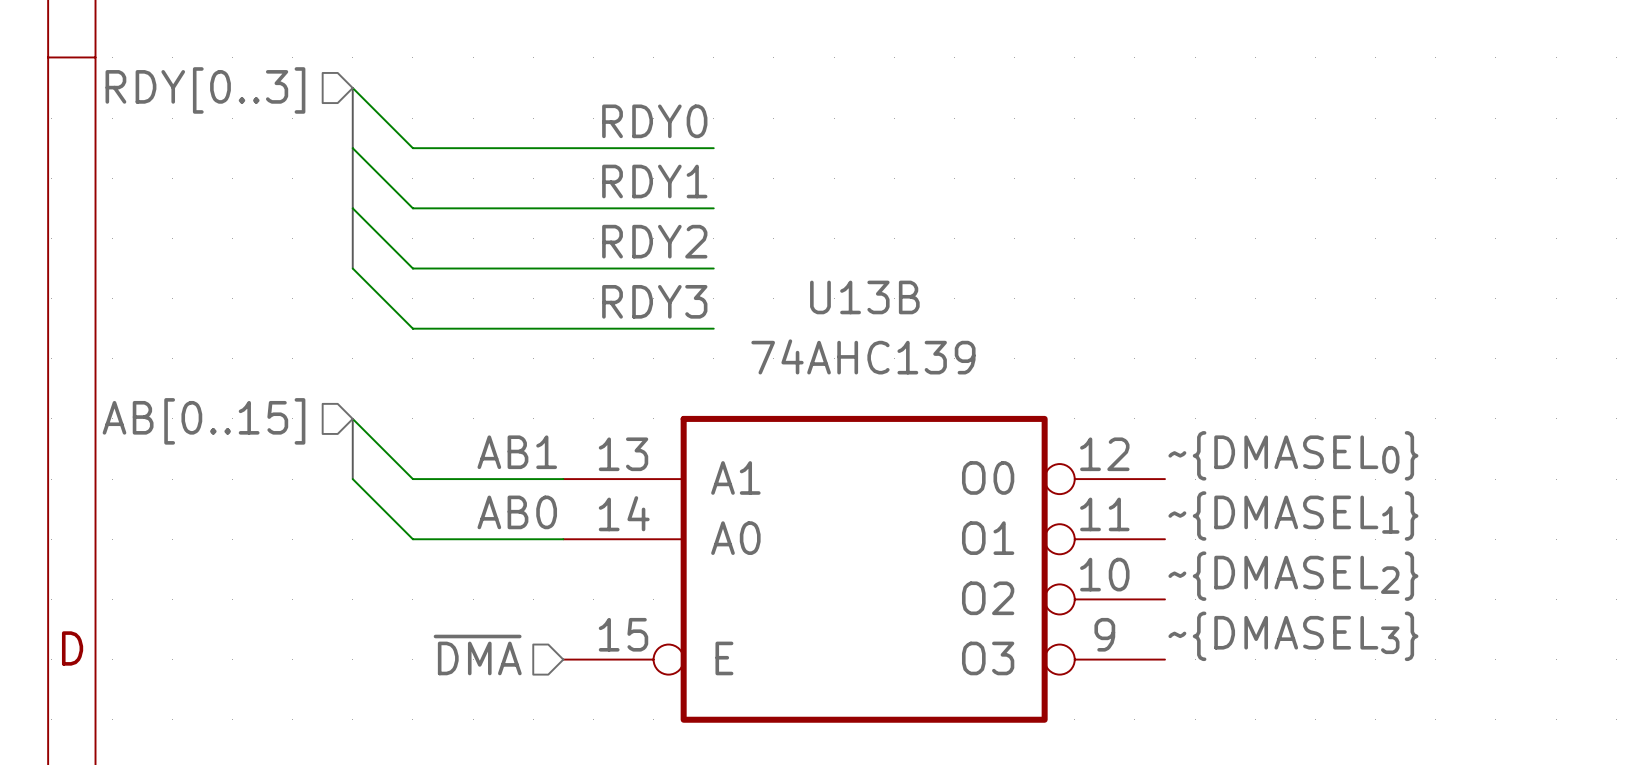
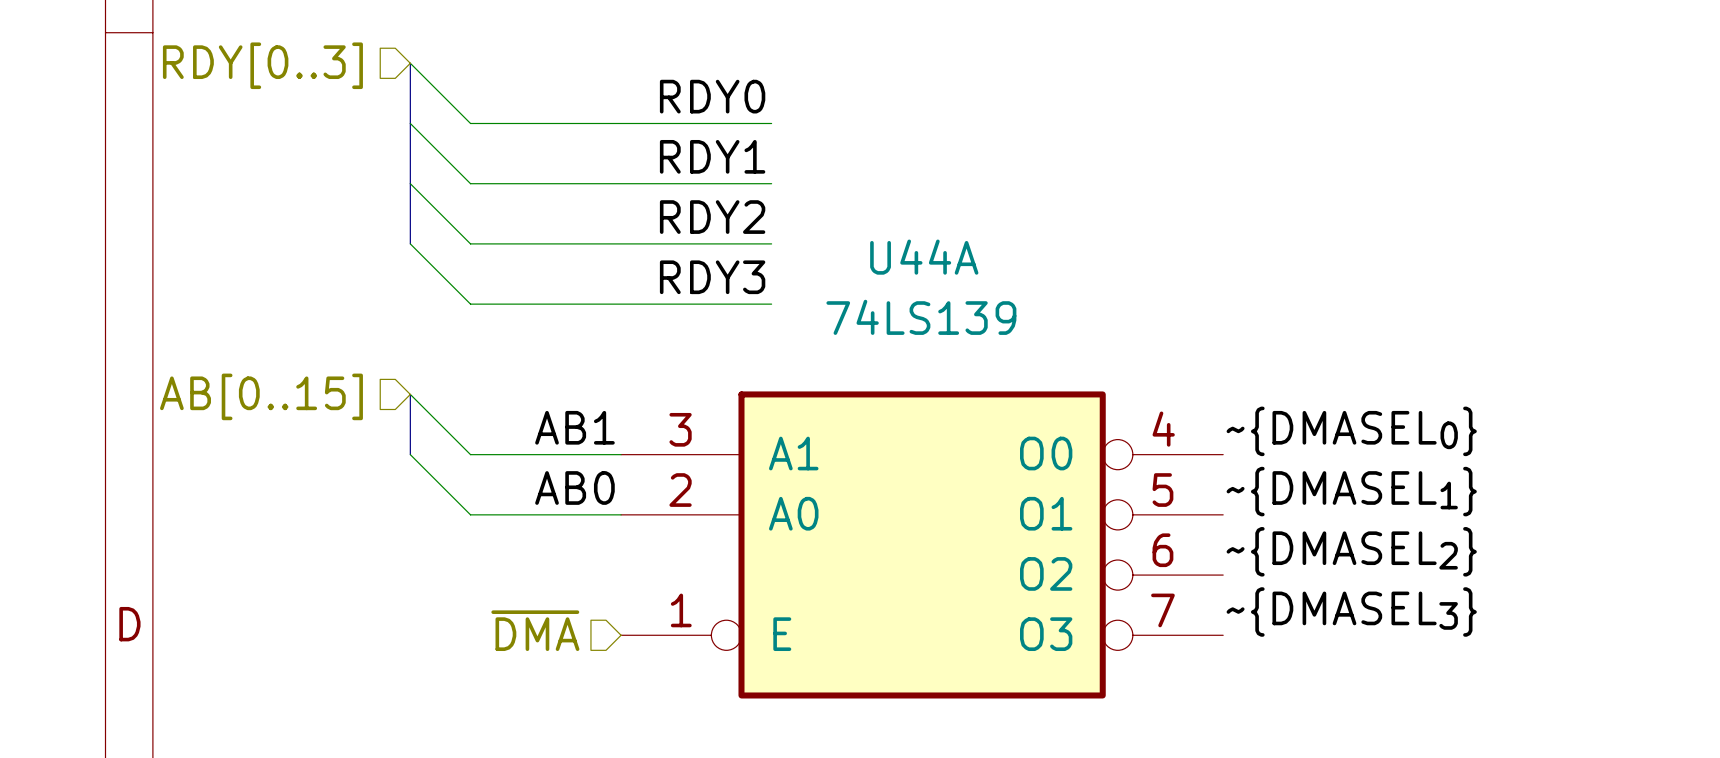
U13B name: U13B (864, 297) -> U44A (924, 257)
U13B value: 74AHC139 (863, 356) -> 74LS139 (921, 317)
U13B pin number: 13 (623, 454) -> 3 (680, 429)
U13B pin number: 12 (1104, 454) -> 4 (1163, 429)
U13B pin number: 14 (624, 513) -> 2 (680, 490)
U13B pin number: 11 (1104, 514) -> 5 (1162, 490)
U13B pin number: 10 (1104, 574) -> 6 (1162, 550)
U13B pin number: 15 (623, 634) -> 1 (681, 610)
U13B pin number: 9 (1104, 634) -> 7 (1162, 610)

